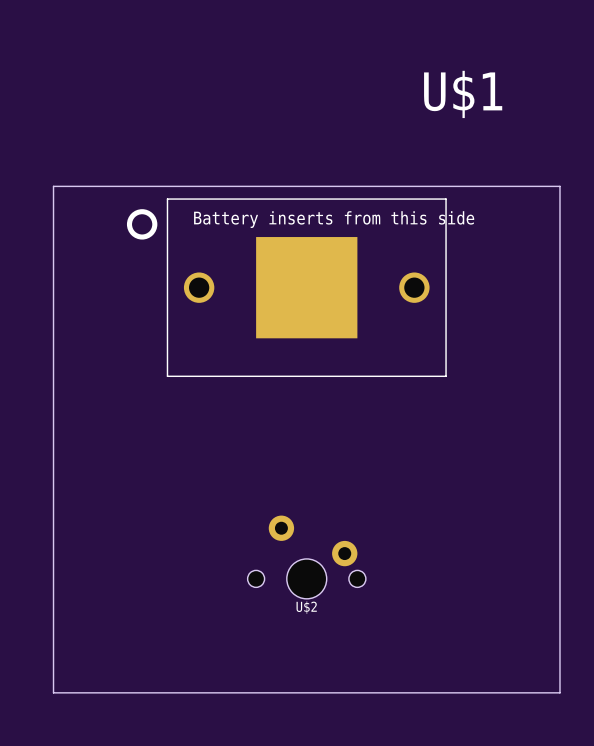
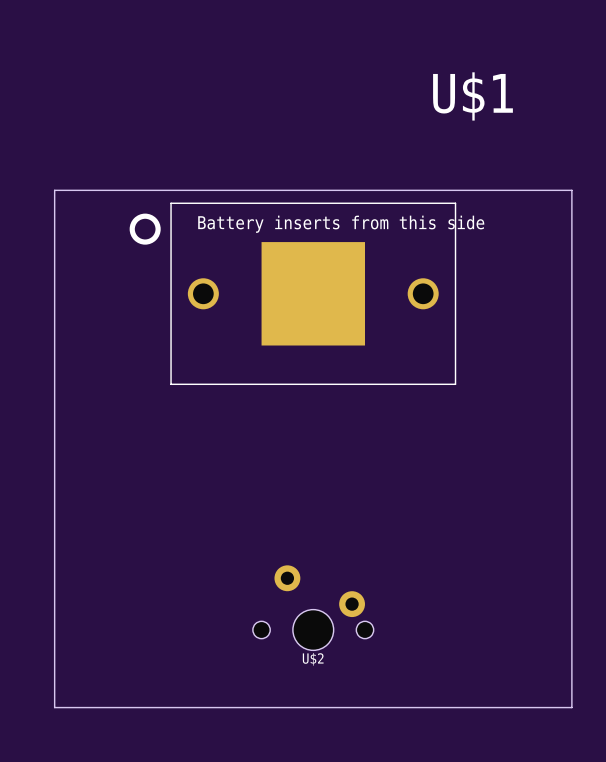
U$2 position: (306, 557) -> (313, 607)

